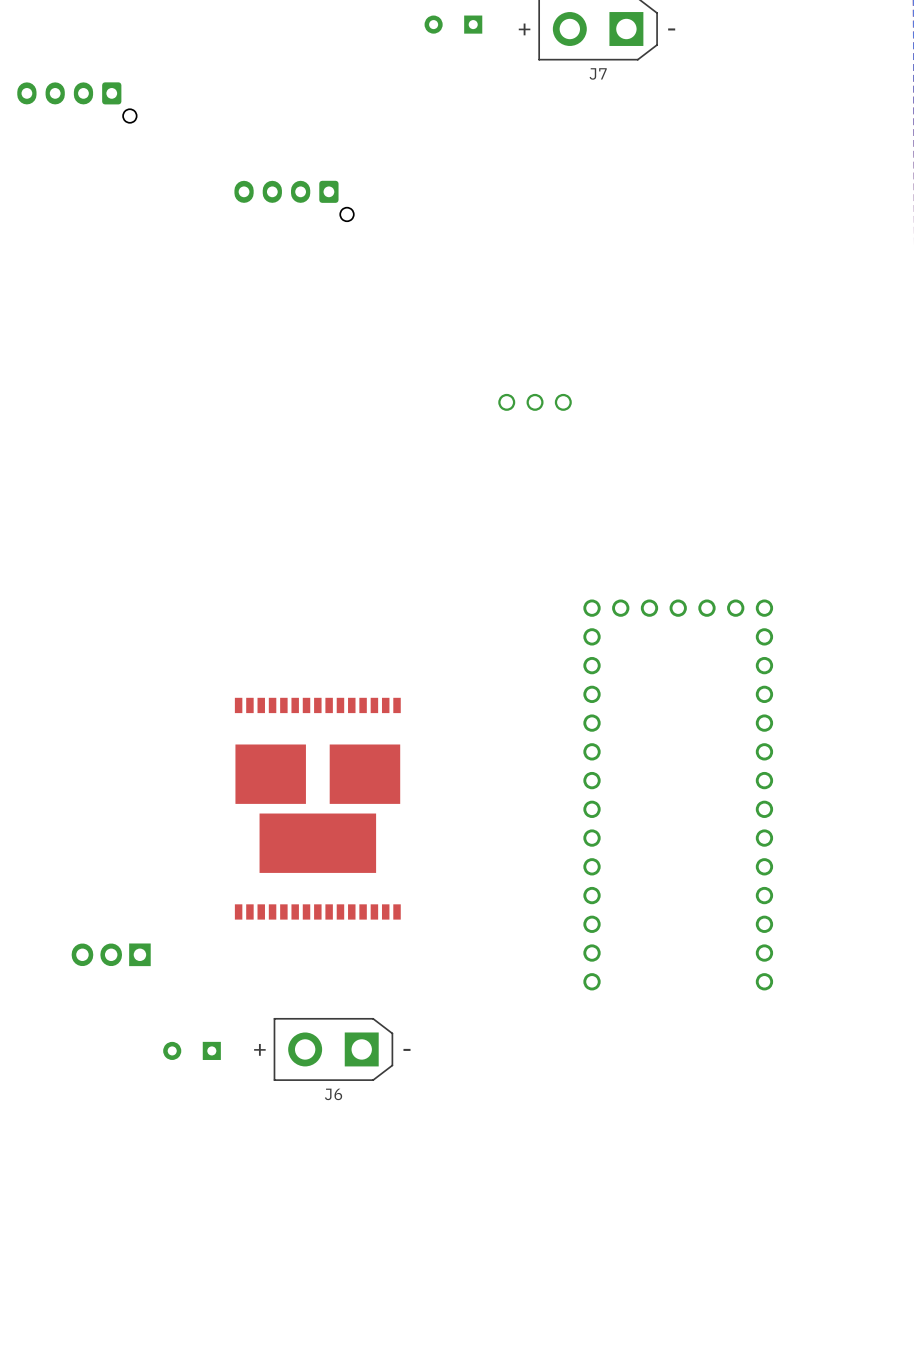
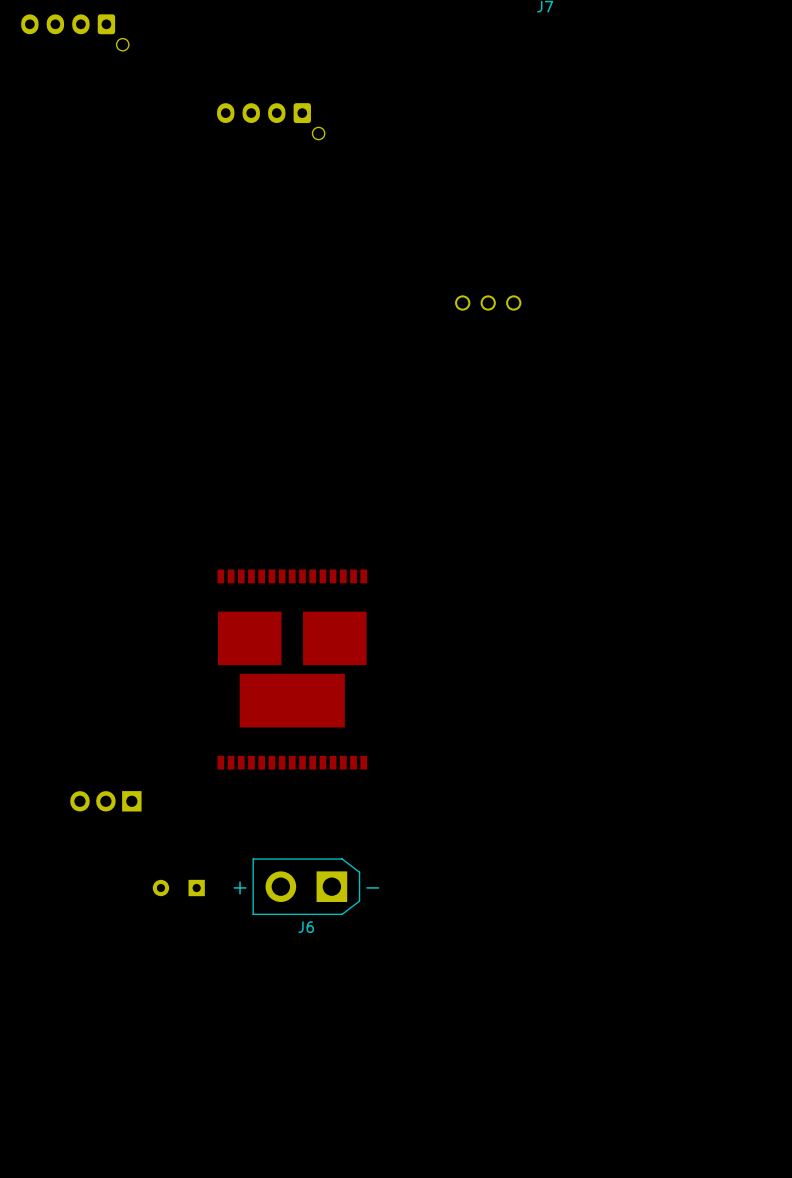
part: (678, 794) -> none

